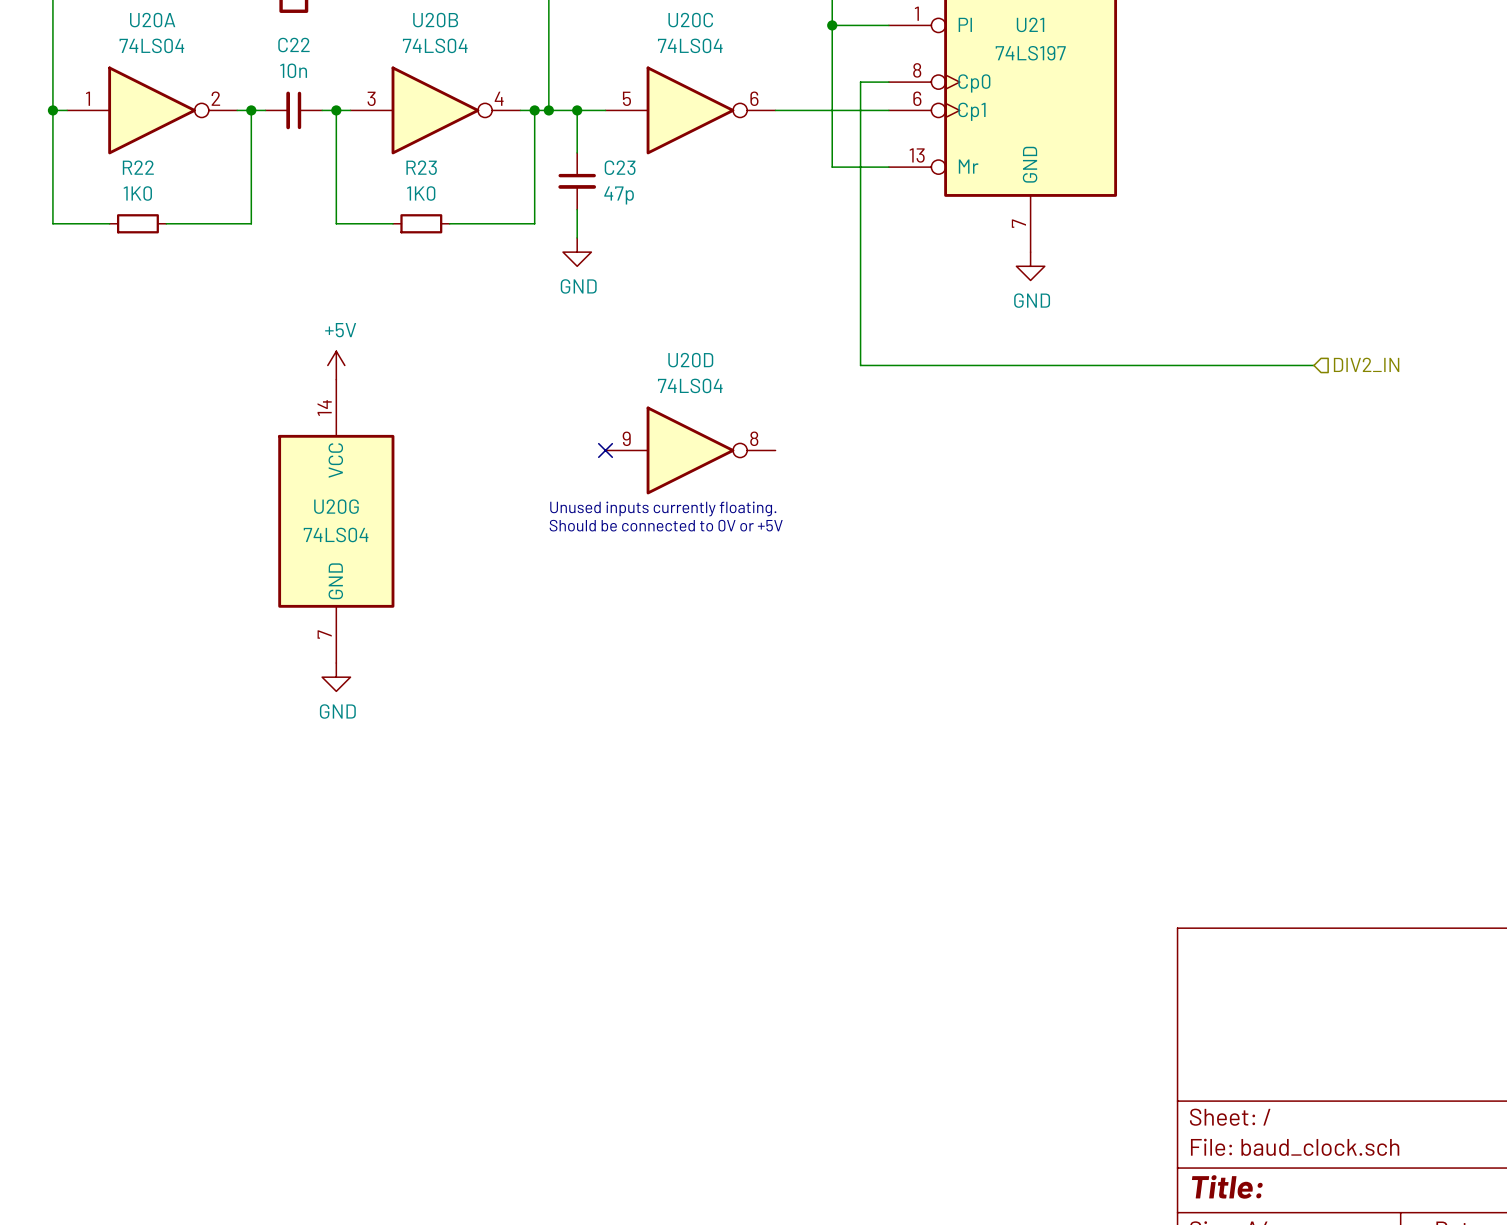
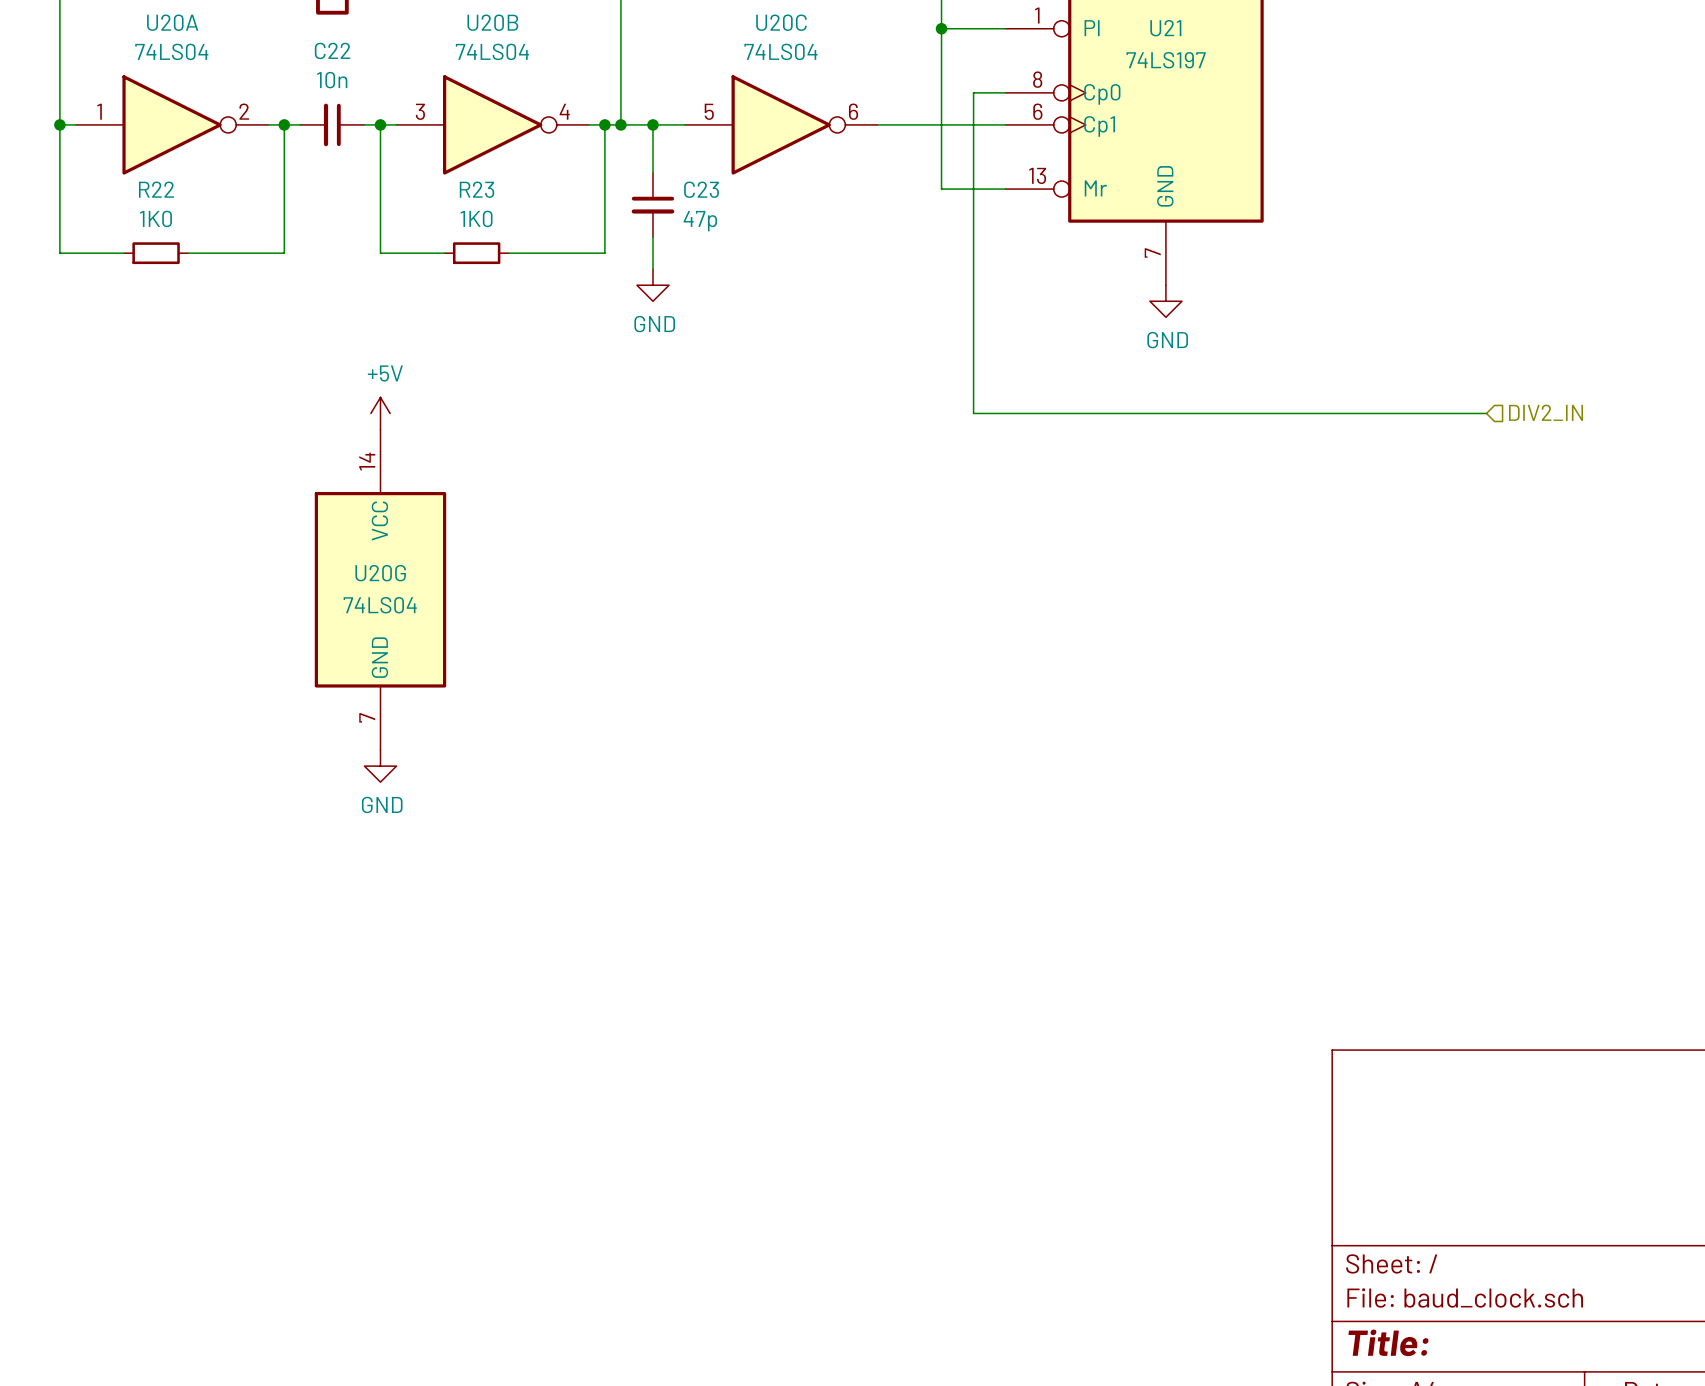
no-connect mark: (605, 450) -> none
U20D: 74LS04 (690, 450) -> none
text: Unused inputs currently floating. (663, 508) -> none
text: Should be connected to 0V or +5V (666, 525) -> none

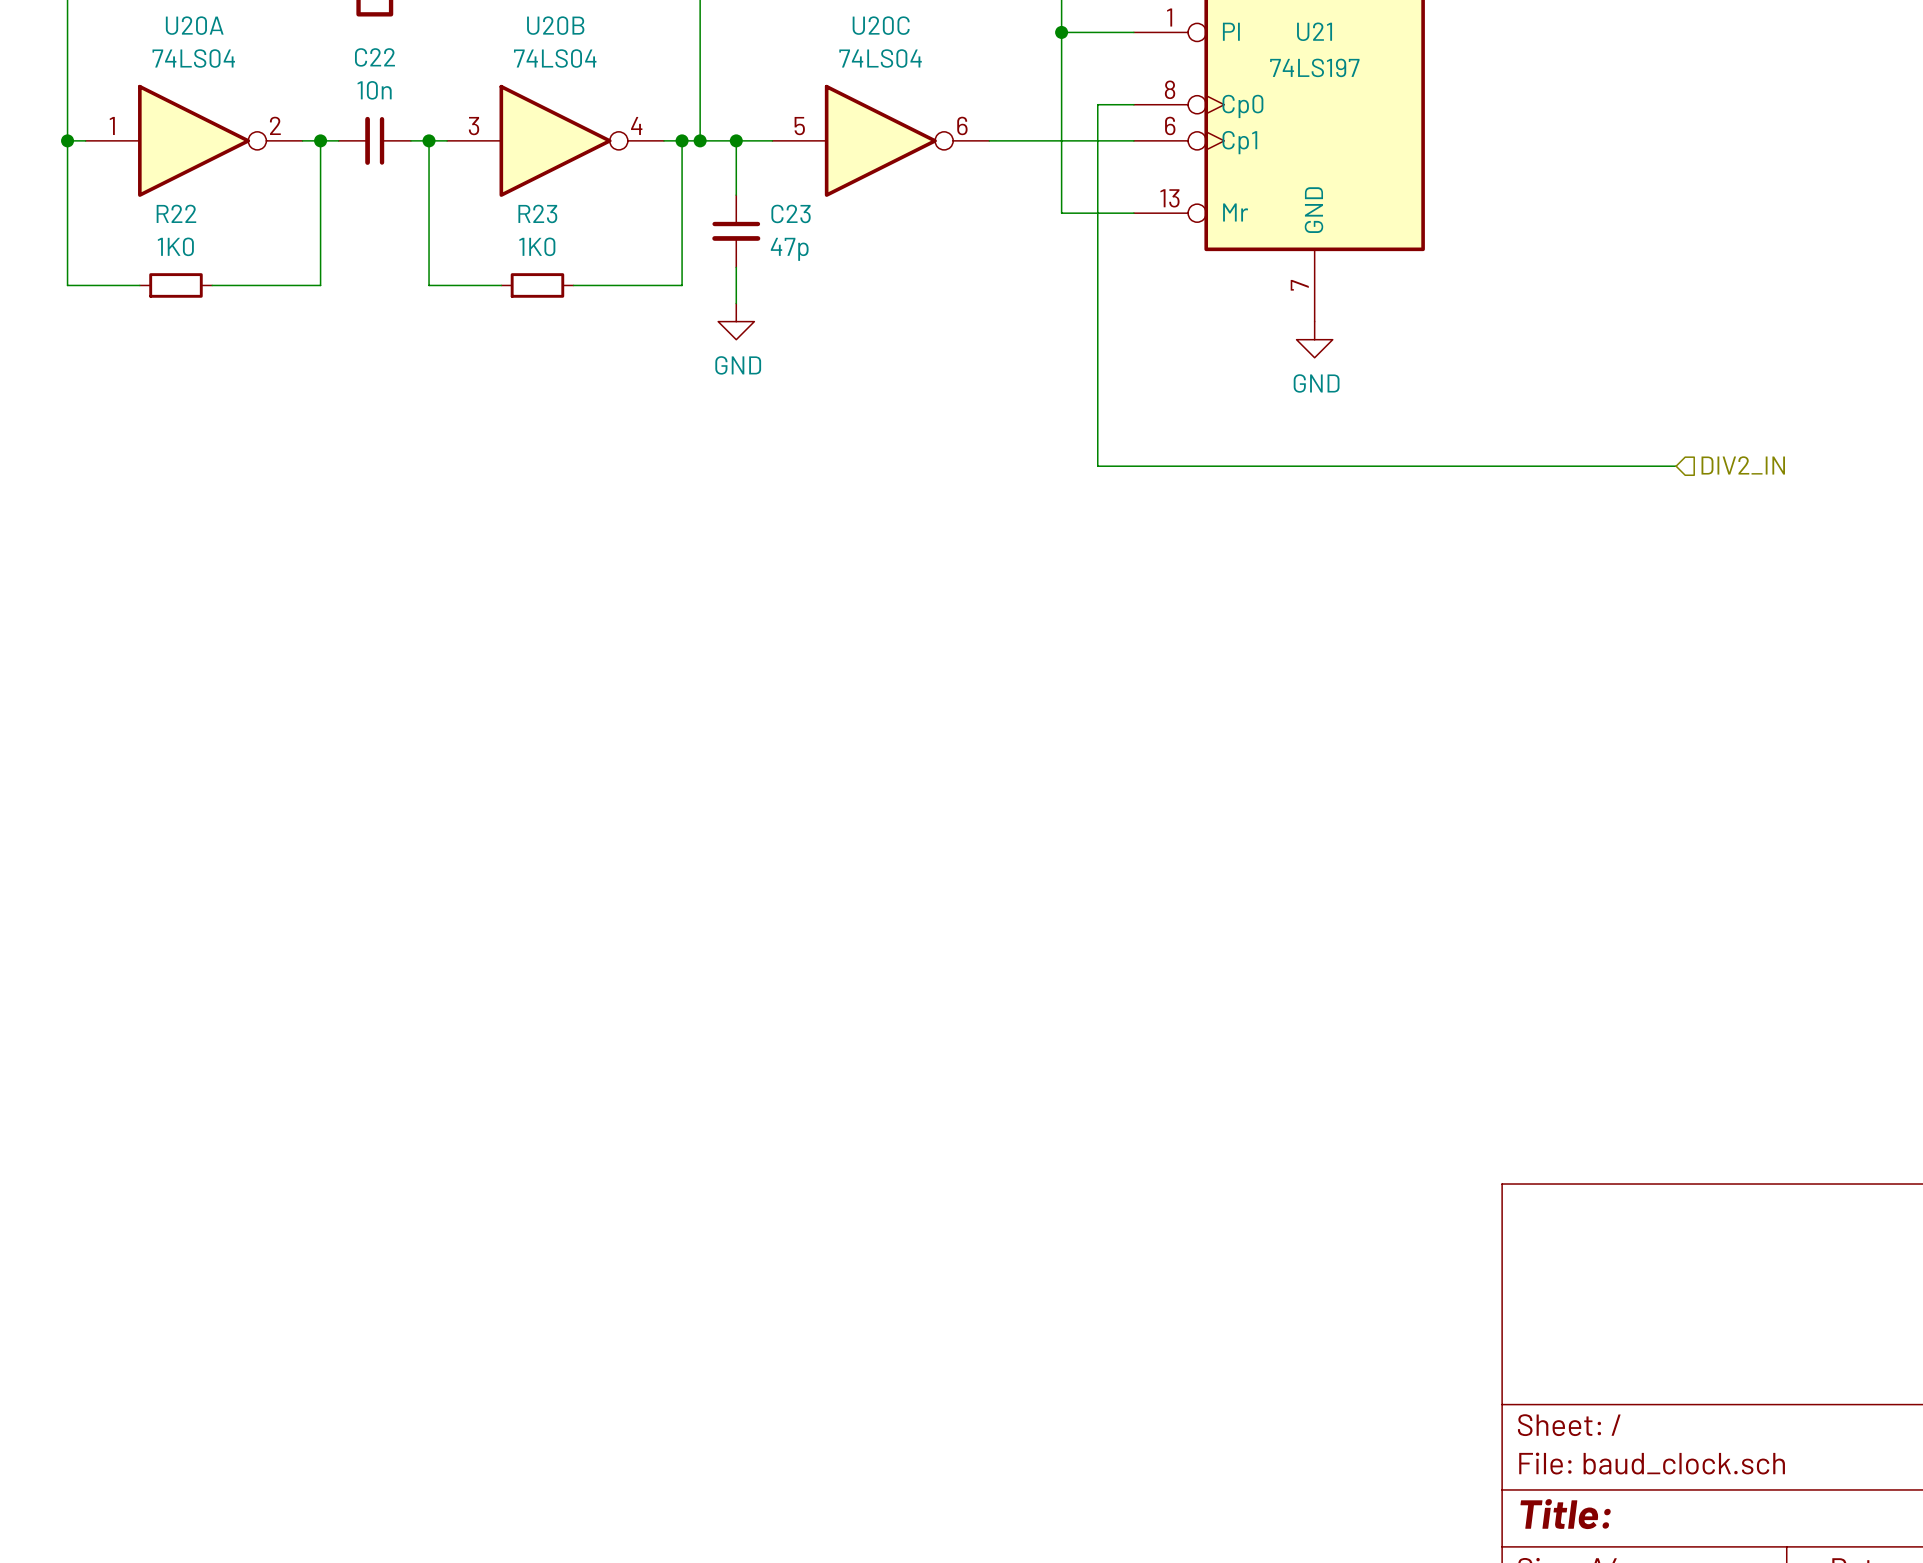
power symbol: +5V (380, 413) -> none
U20G: 74LS04 (380, 589) -> none
power symbol: GND (380, 766) -> none

